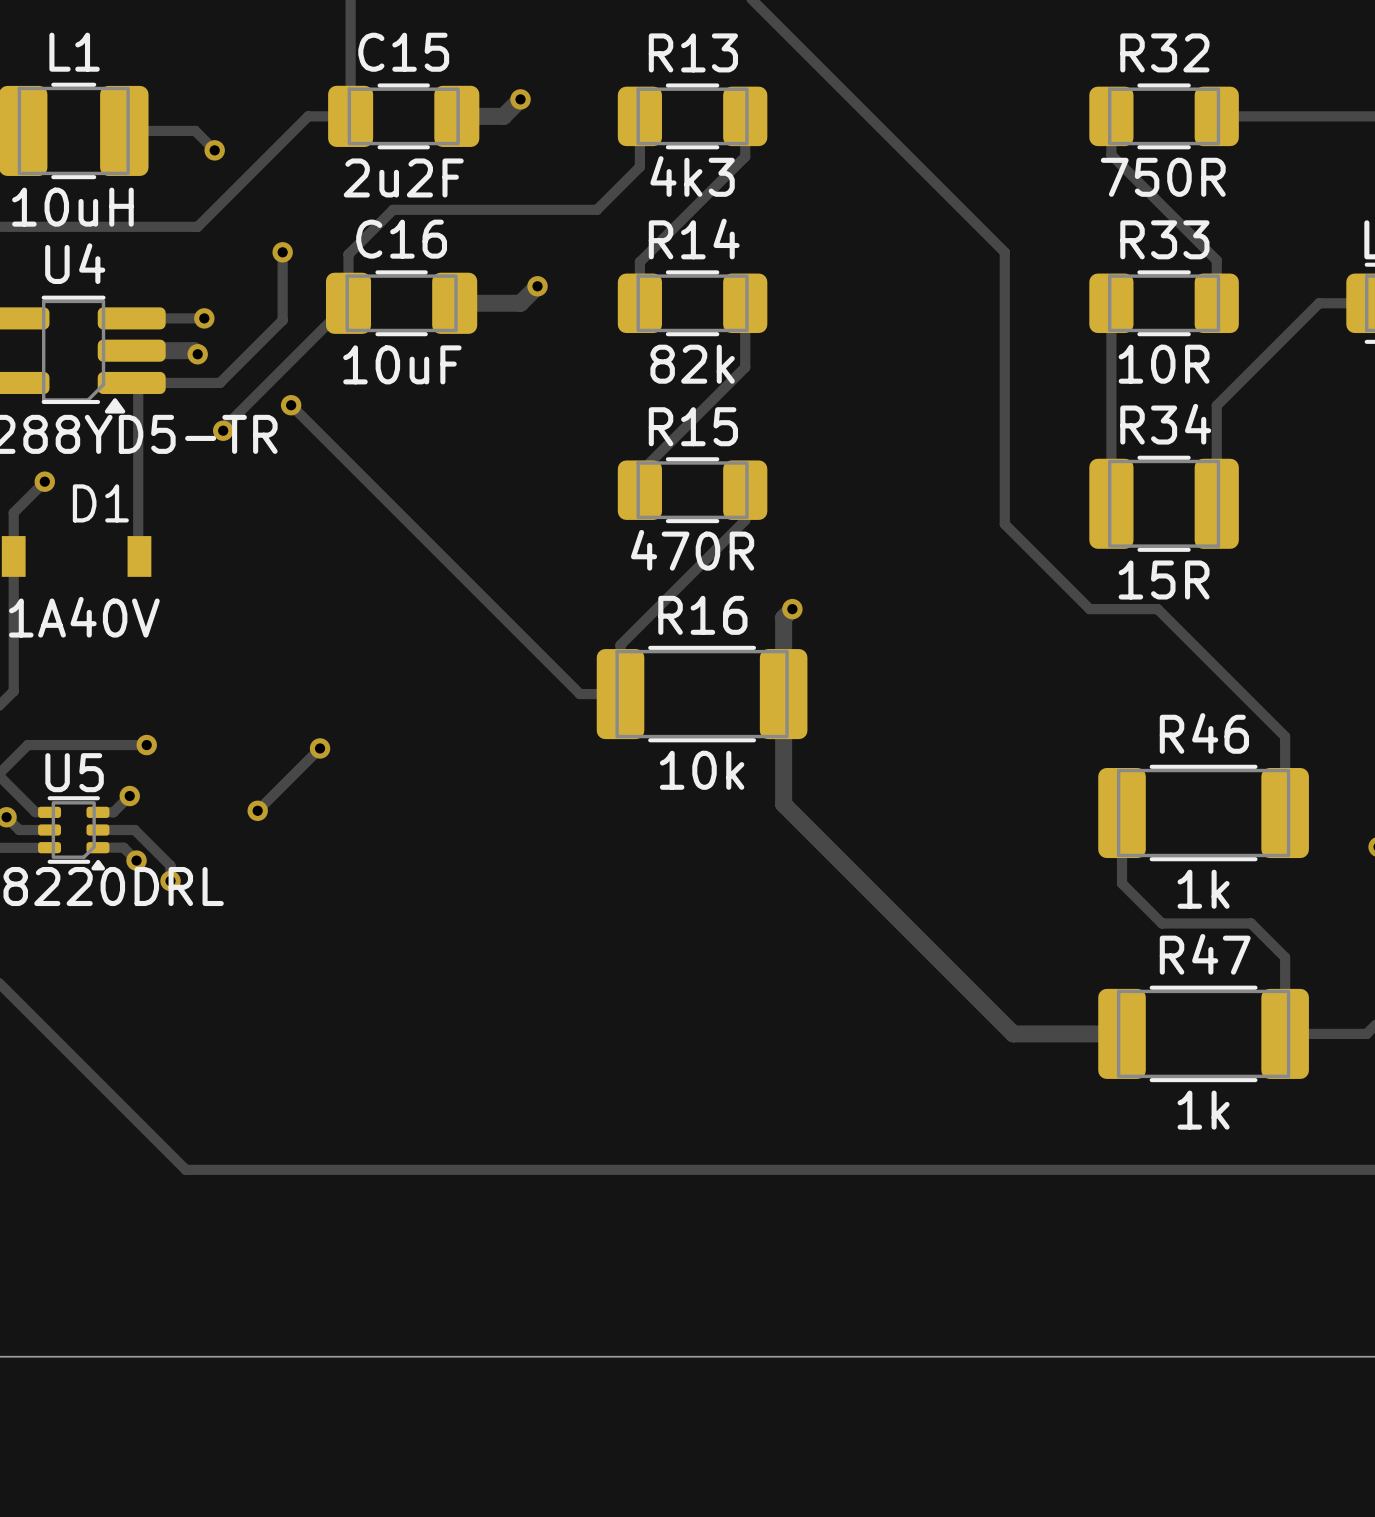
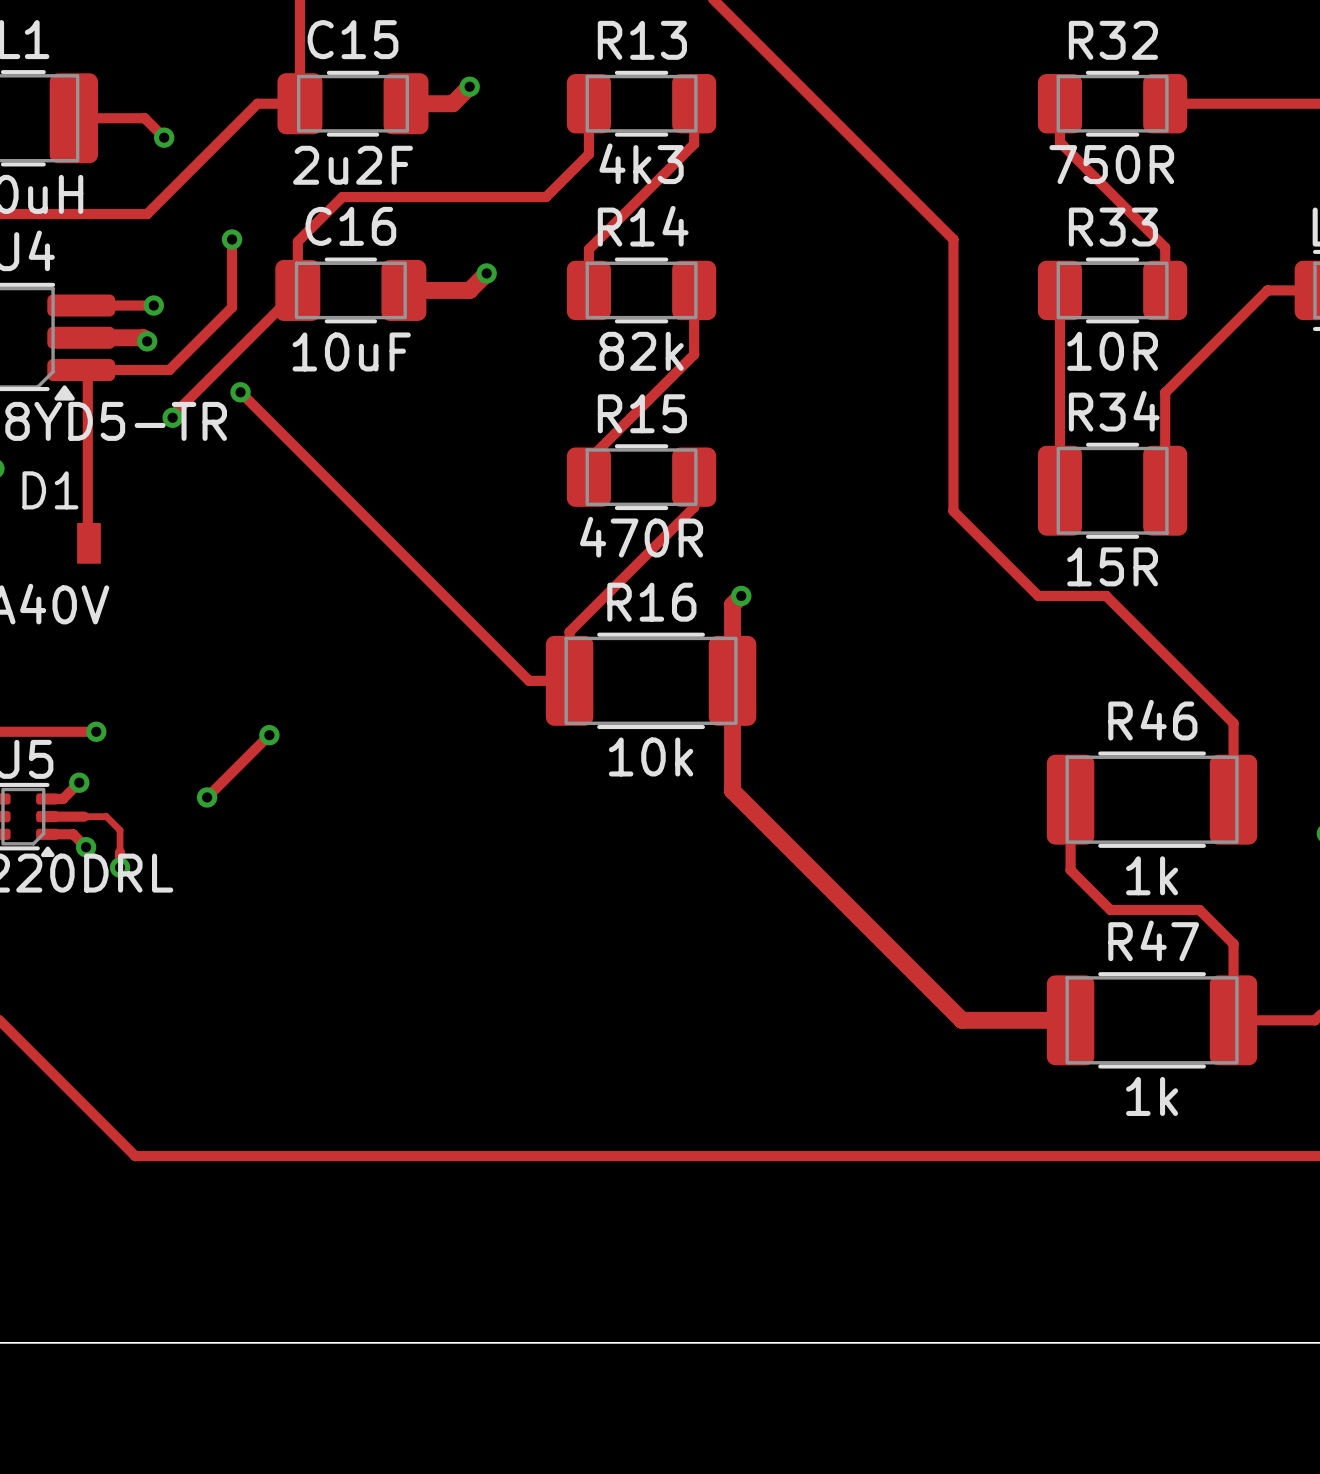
track: (134, 830) (170, 865) -> (84, 816) (106, 816) (120, 830) (120, 852)

